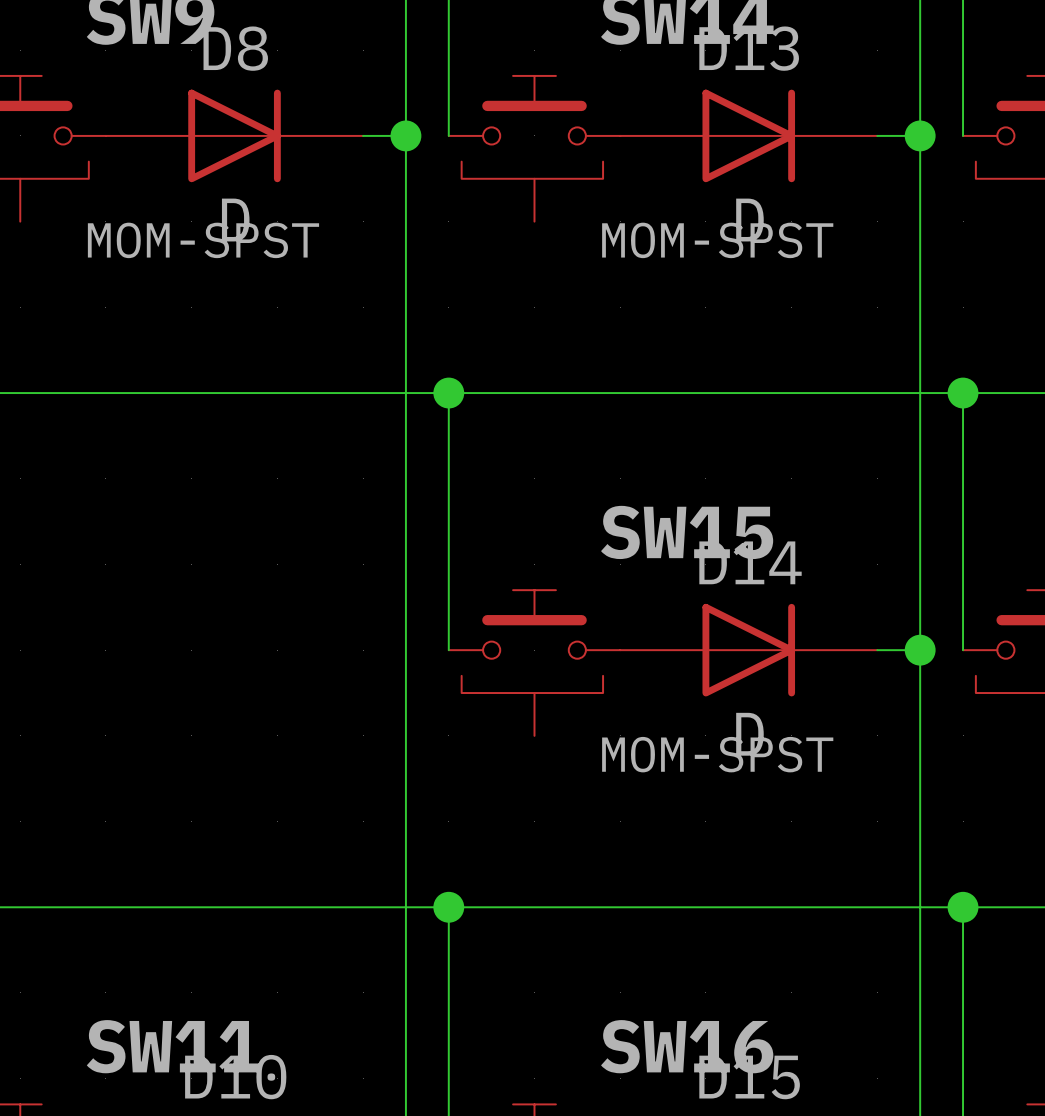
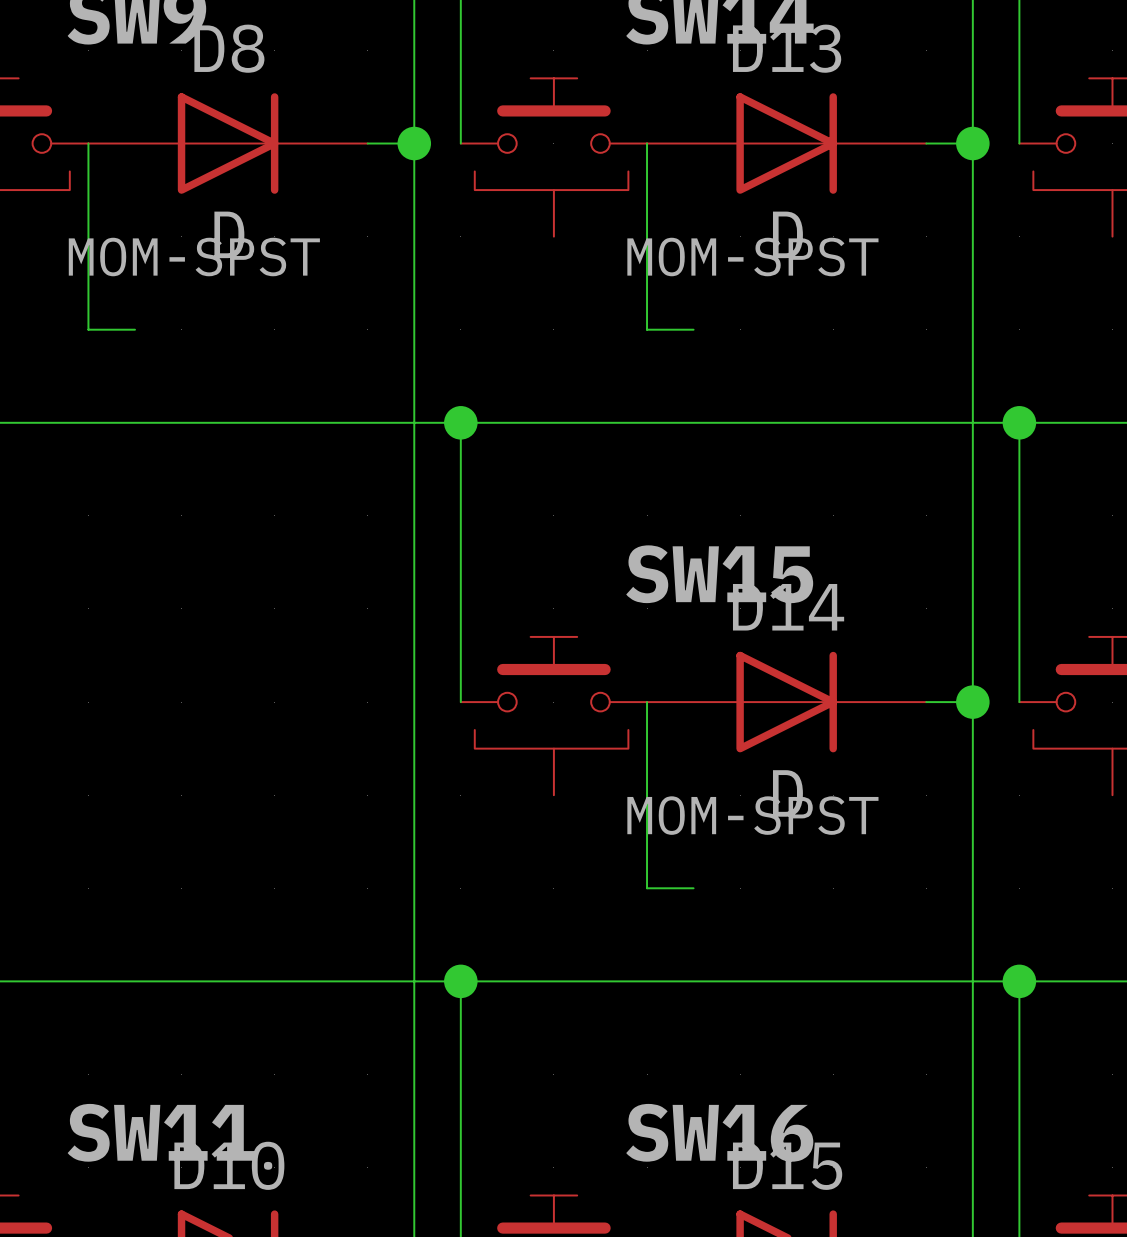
wire: none -> (88, 143) (88, 329) (134, 329)
wire: none -> (647, 143) (647, 329) (693, 329)
wire: none -> (647, 702) (647, 888) (693, 888)

